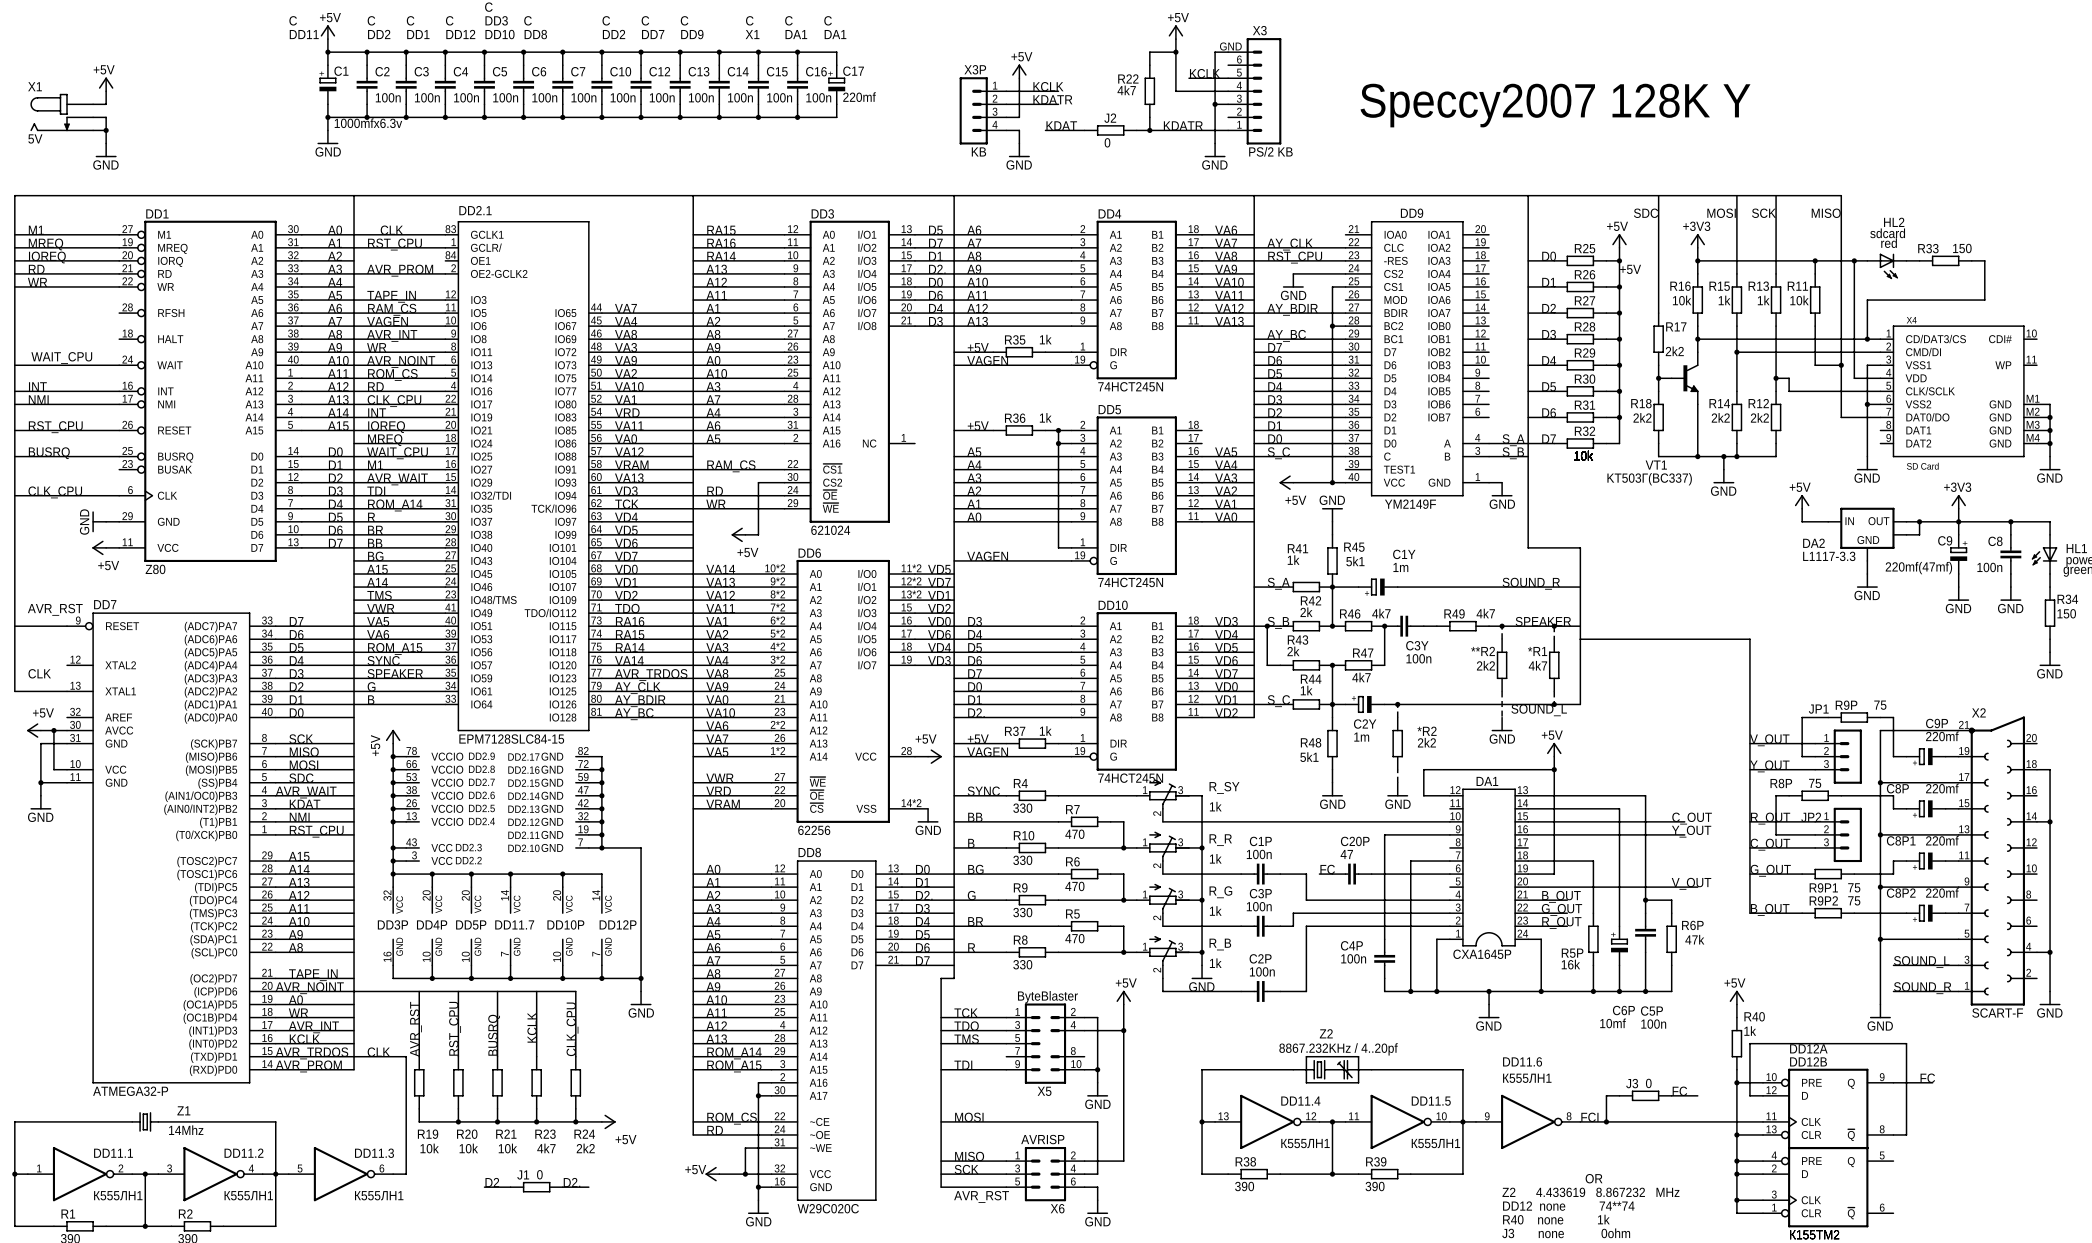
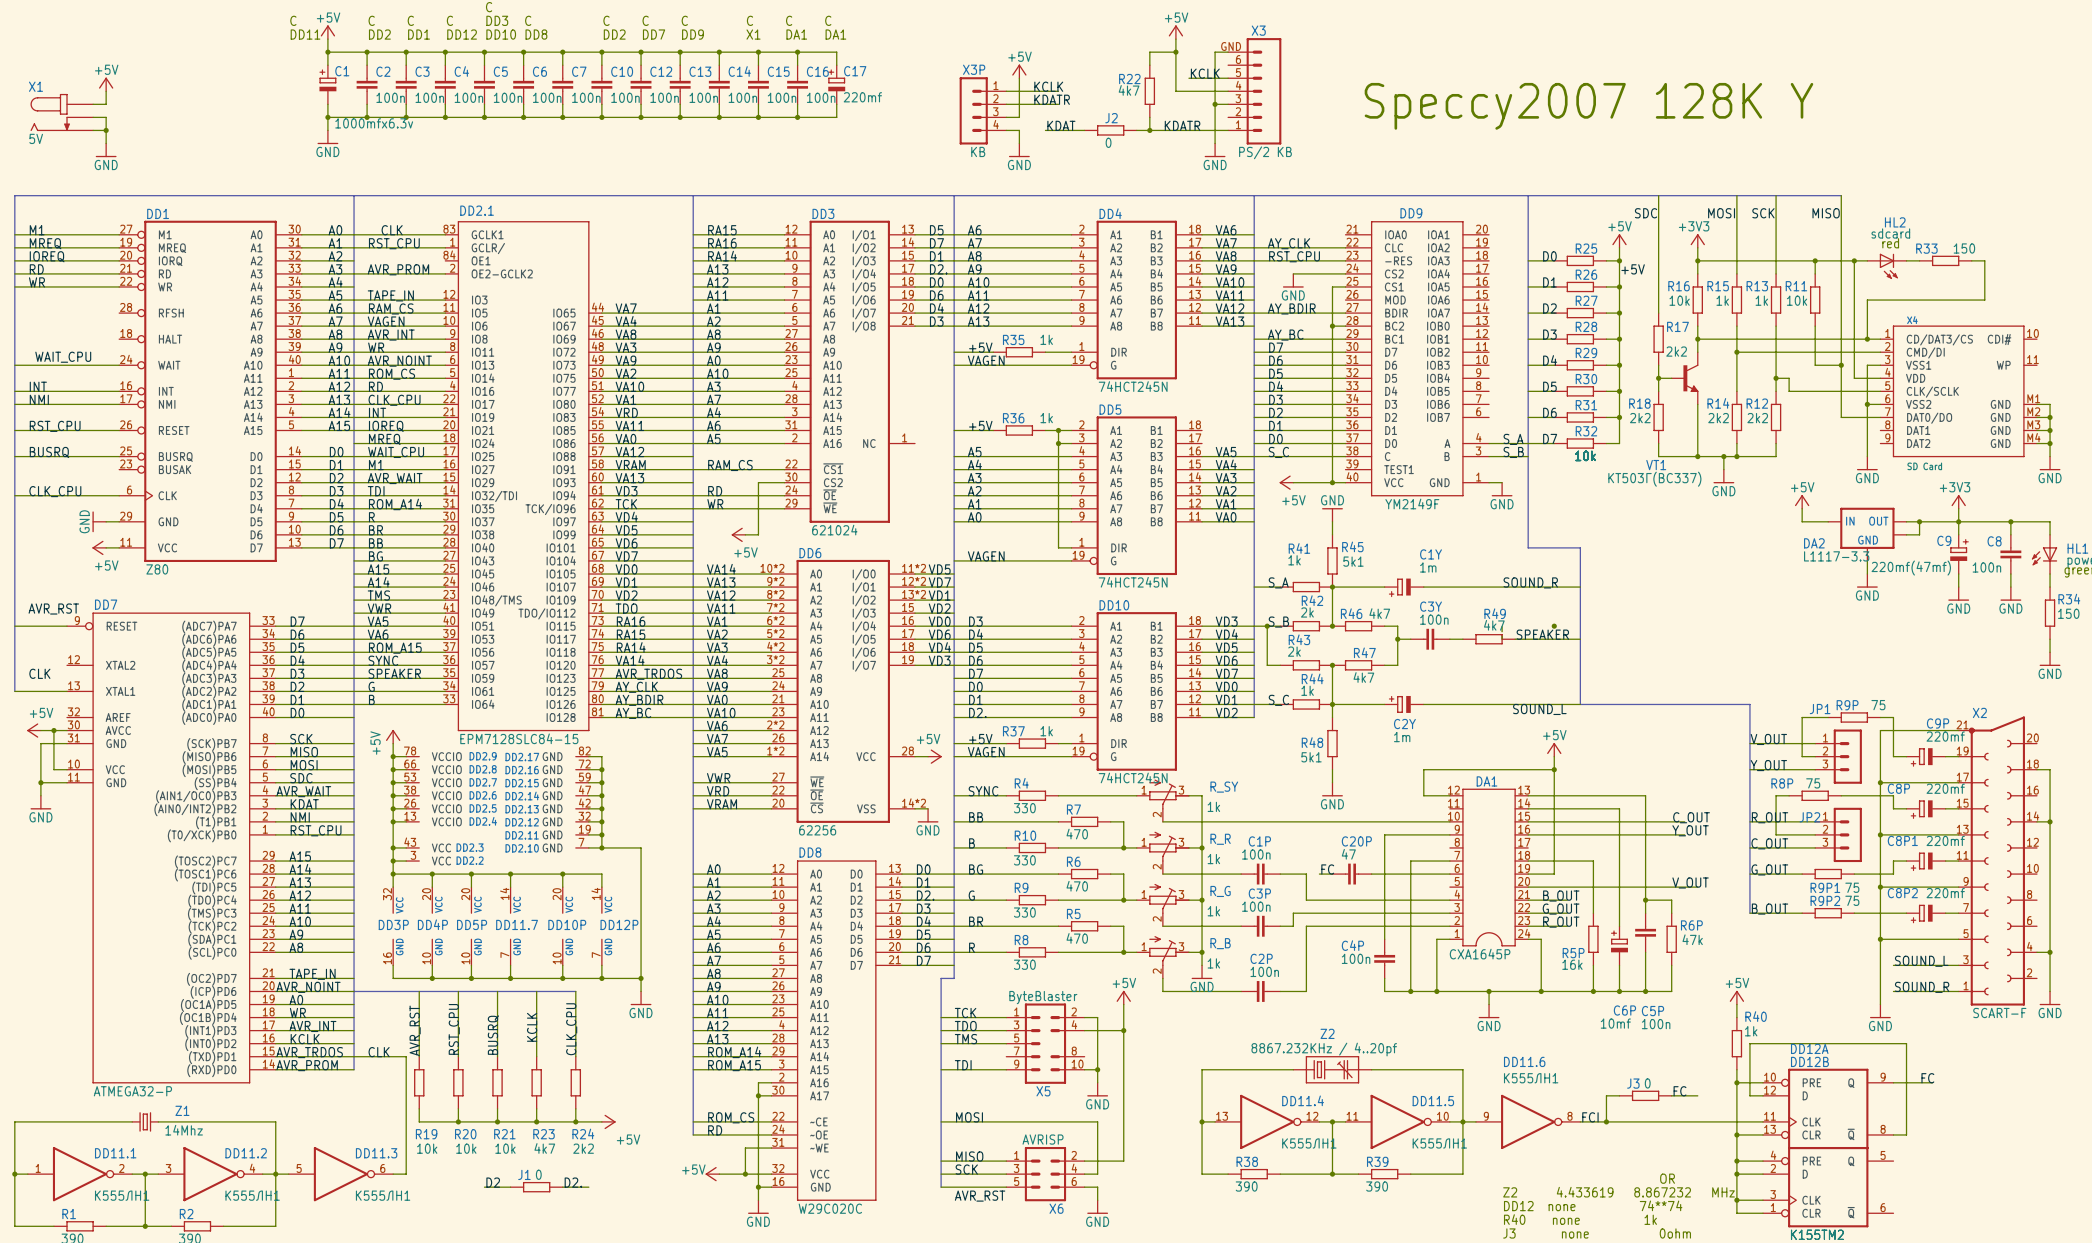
C1Y position: (1378, 587) -> (1404, 587)
R49 name position: R49 (1454, 613) -> R49 (1495, 613)
R49 value position: 4k7 (1485, 613) -> 4k7 (1494, 625)
label position: SPEAKER (1543, 621) -> SPEAKER (1542, 634)
wire: (1384, 626) (1384, 665) -> (1384, 626) (1397, 626) (1397, 665) (1384, 665)
junction position: (1384, 626) -> (1397, 639)
C3Y position: (1404, 626) -> (1430, 639)
wire: (1423, 626) (1436, 626) -> (1449, 639) (1462, 639)
R49 position: (1462, 626) -> (1489, 639)
wire: (1489, 626) (1580, 626) -> none
junction: (1502, 626) -> none
wire: (1554, 626) (1554, 639) -> none
wire: none -> (1397, 639) (1410, 639)
wire: none -> (1515, 639) (1580, 639)
bus: (1580, 639) (1749, 639) (1749, 704) -> (1580, 704) (1749, 704)
C3Y name position: C3Y (1417, 645) -> C3Y (1431, 606)
C3Y value position: 100n (1418, 658) -> 100n (1434, 619)
**R2: 2k2 (1502, 665) -> none
*R1: 4k7 (1554, 665) -> none
wire: (1502, 691) (1502, 717) -> none
wire: (1554, 691) (1554, 704) -> none
C2Y position: (1365, 704) -> (1404, 704)
junction: (1397, 704) -> none
junction: (1554, 704) -> none
power symbol: GND (1502, 724) -> none
*R2: 2k2 (1397, 743) -> none
wire: (1397, 769) (1397, 782) -> none
power symbol: GND (1397, 789) -> none

